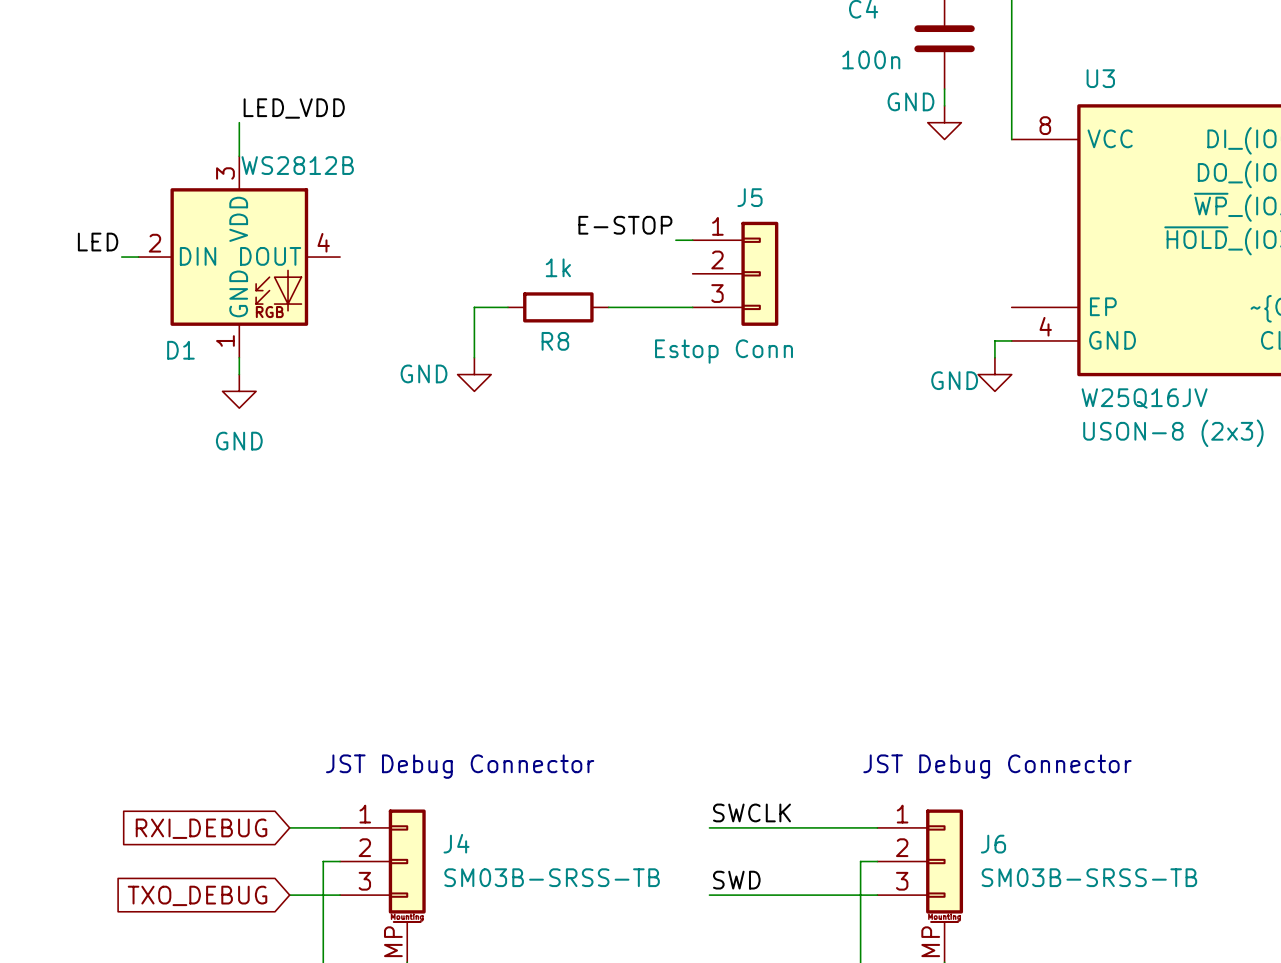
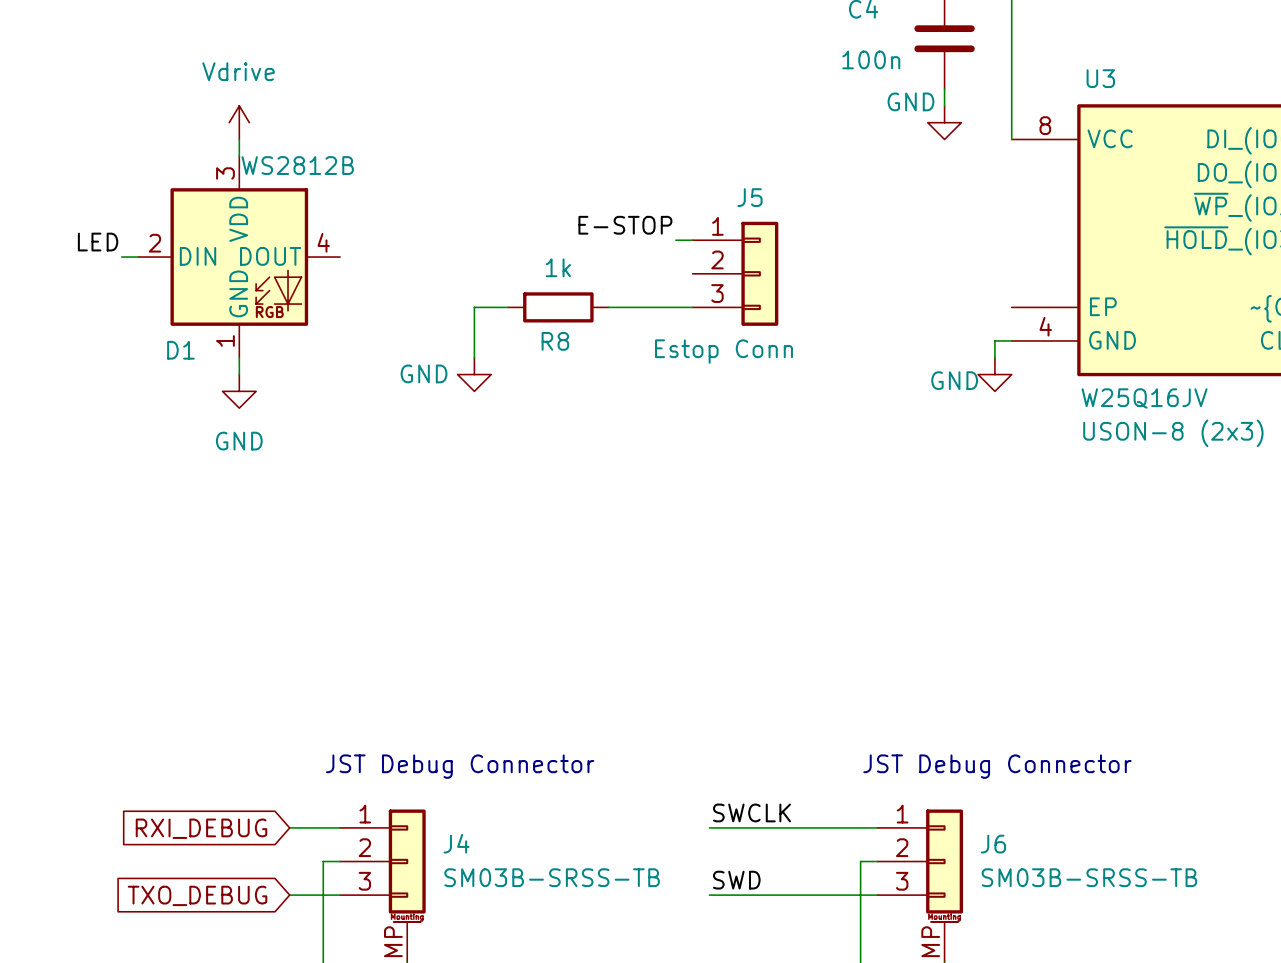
label: LED_VDD (294, 108) -> none
power symbol: none -> Vdrive (239, 122)

